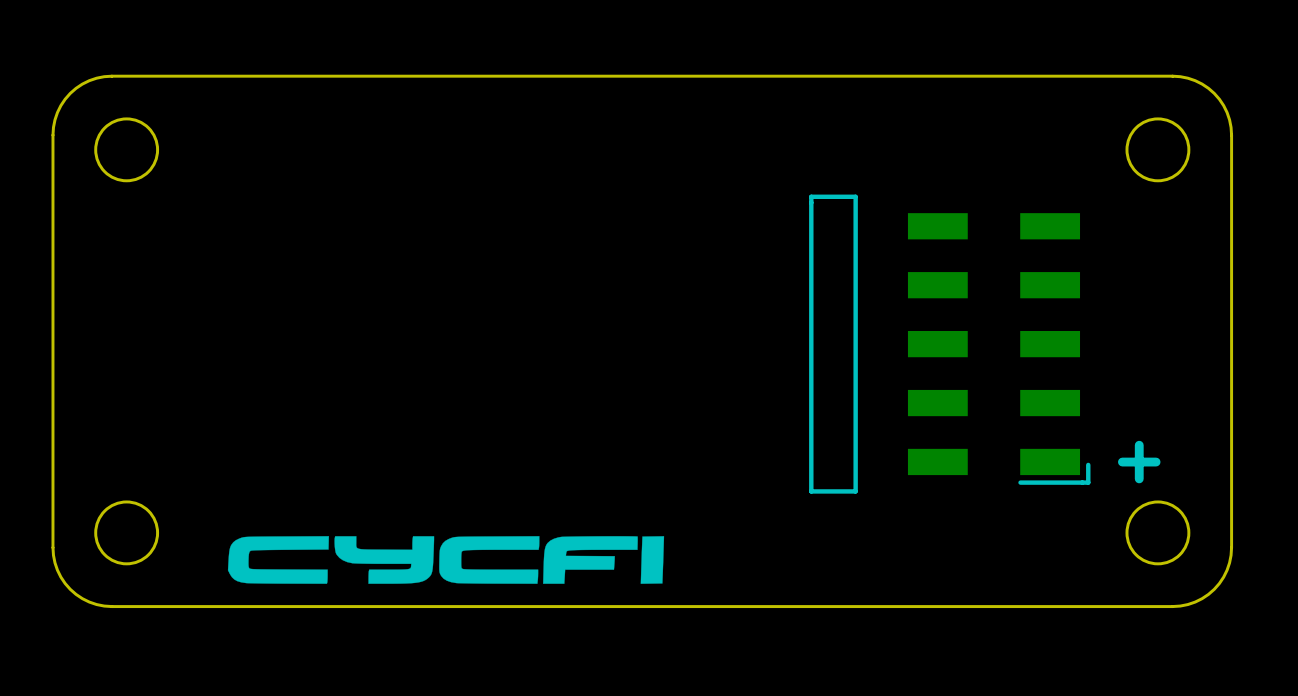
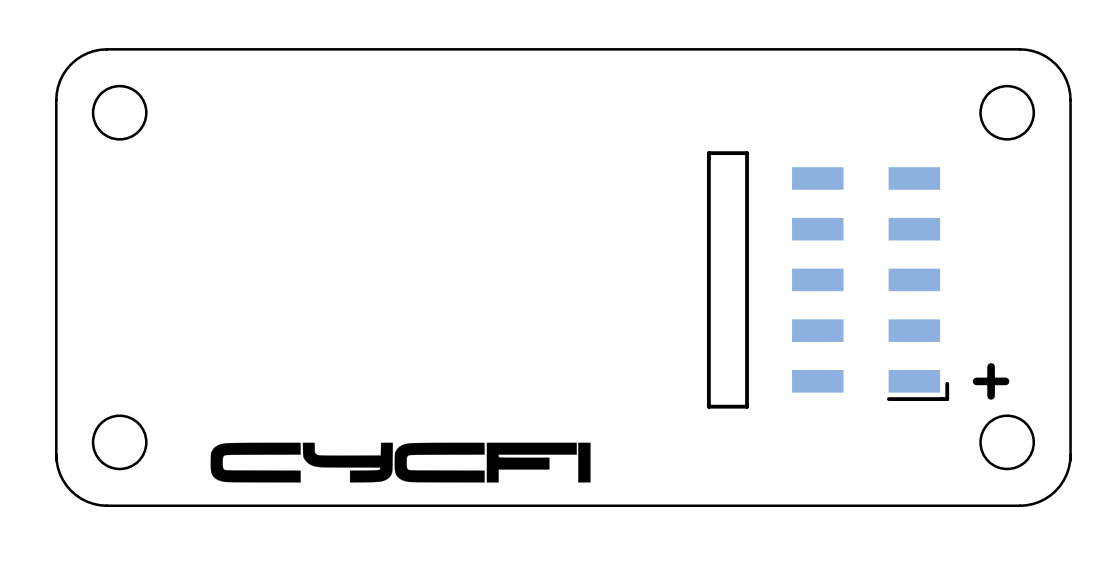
drawing shape: [227, 536, 665, 584] -> [210, 442, 591, 483]

